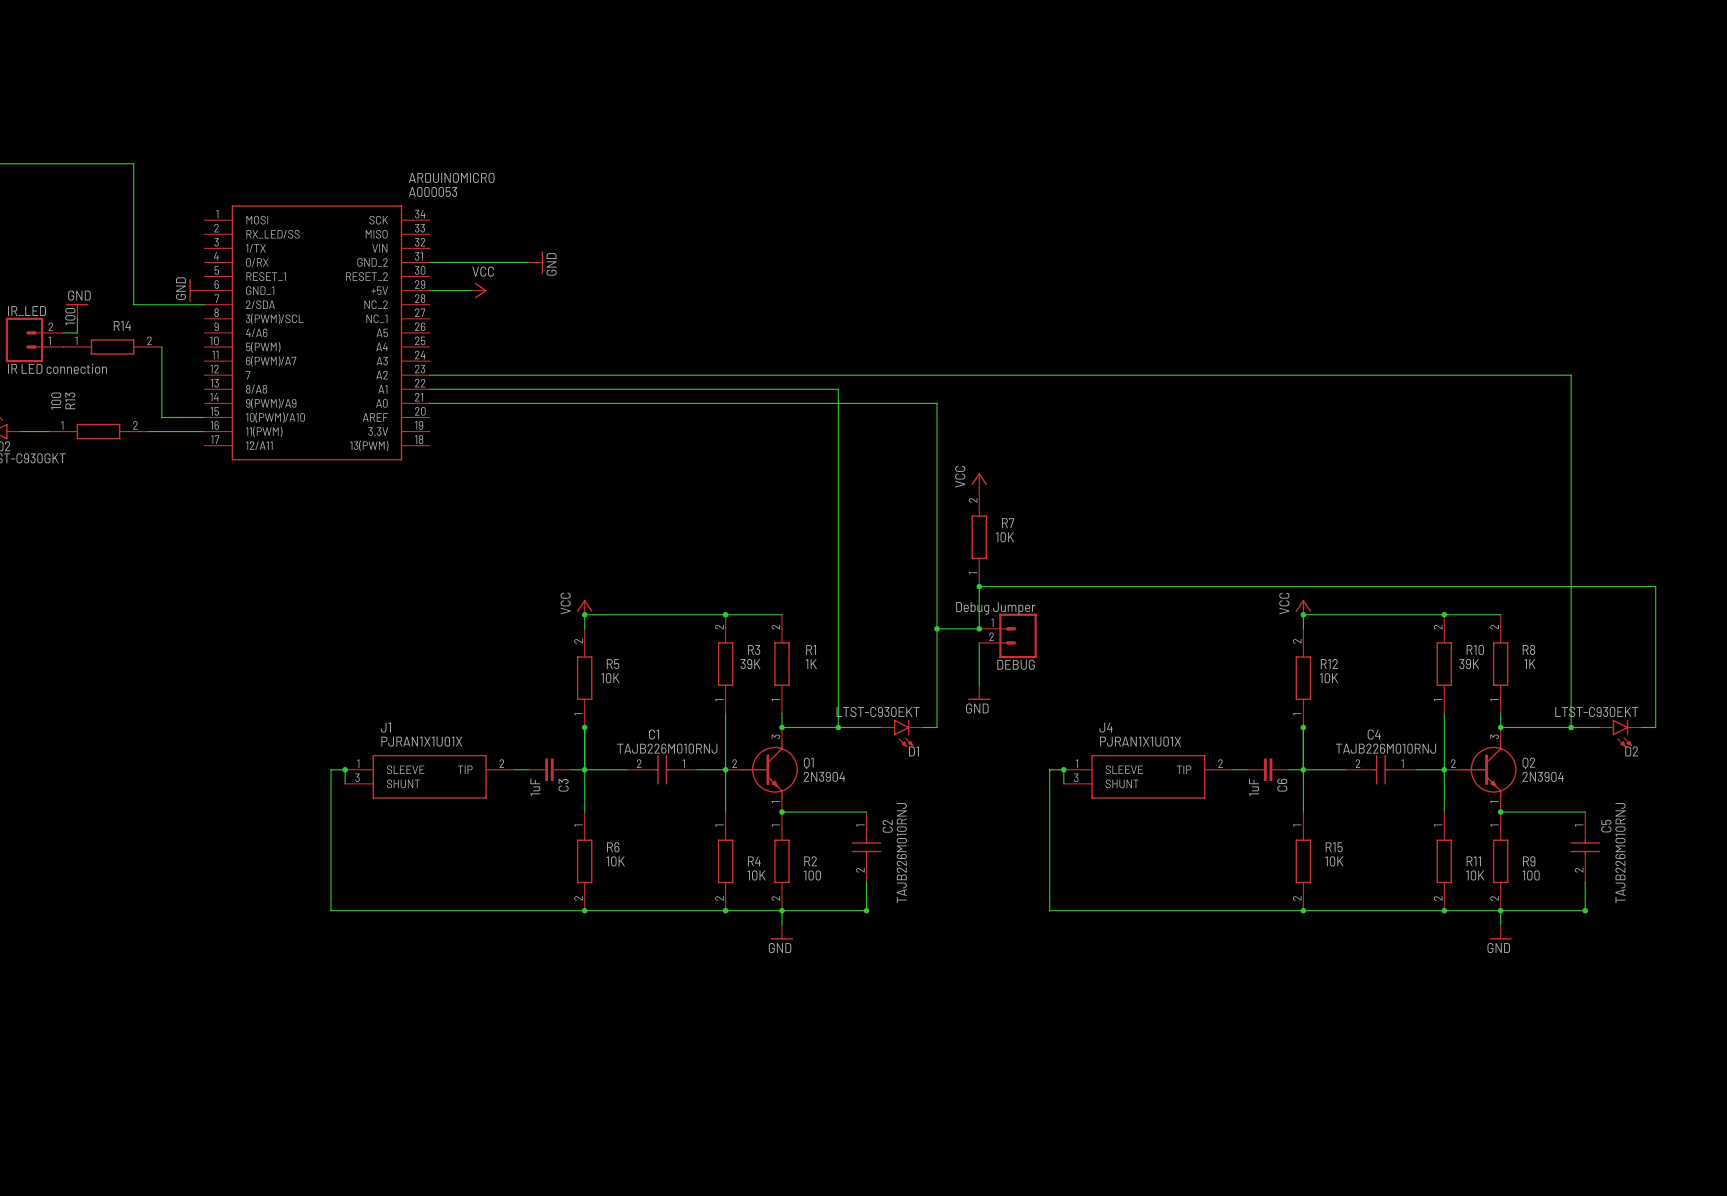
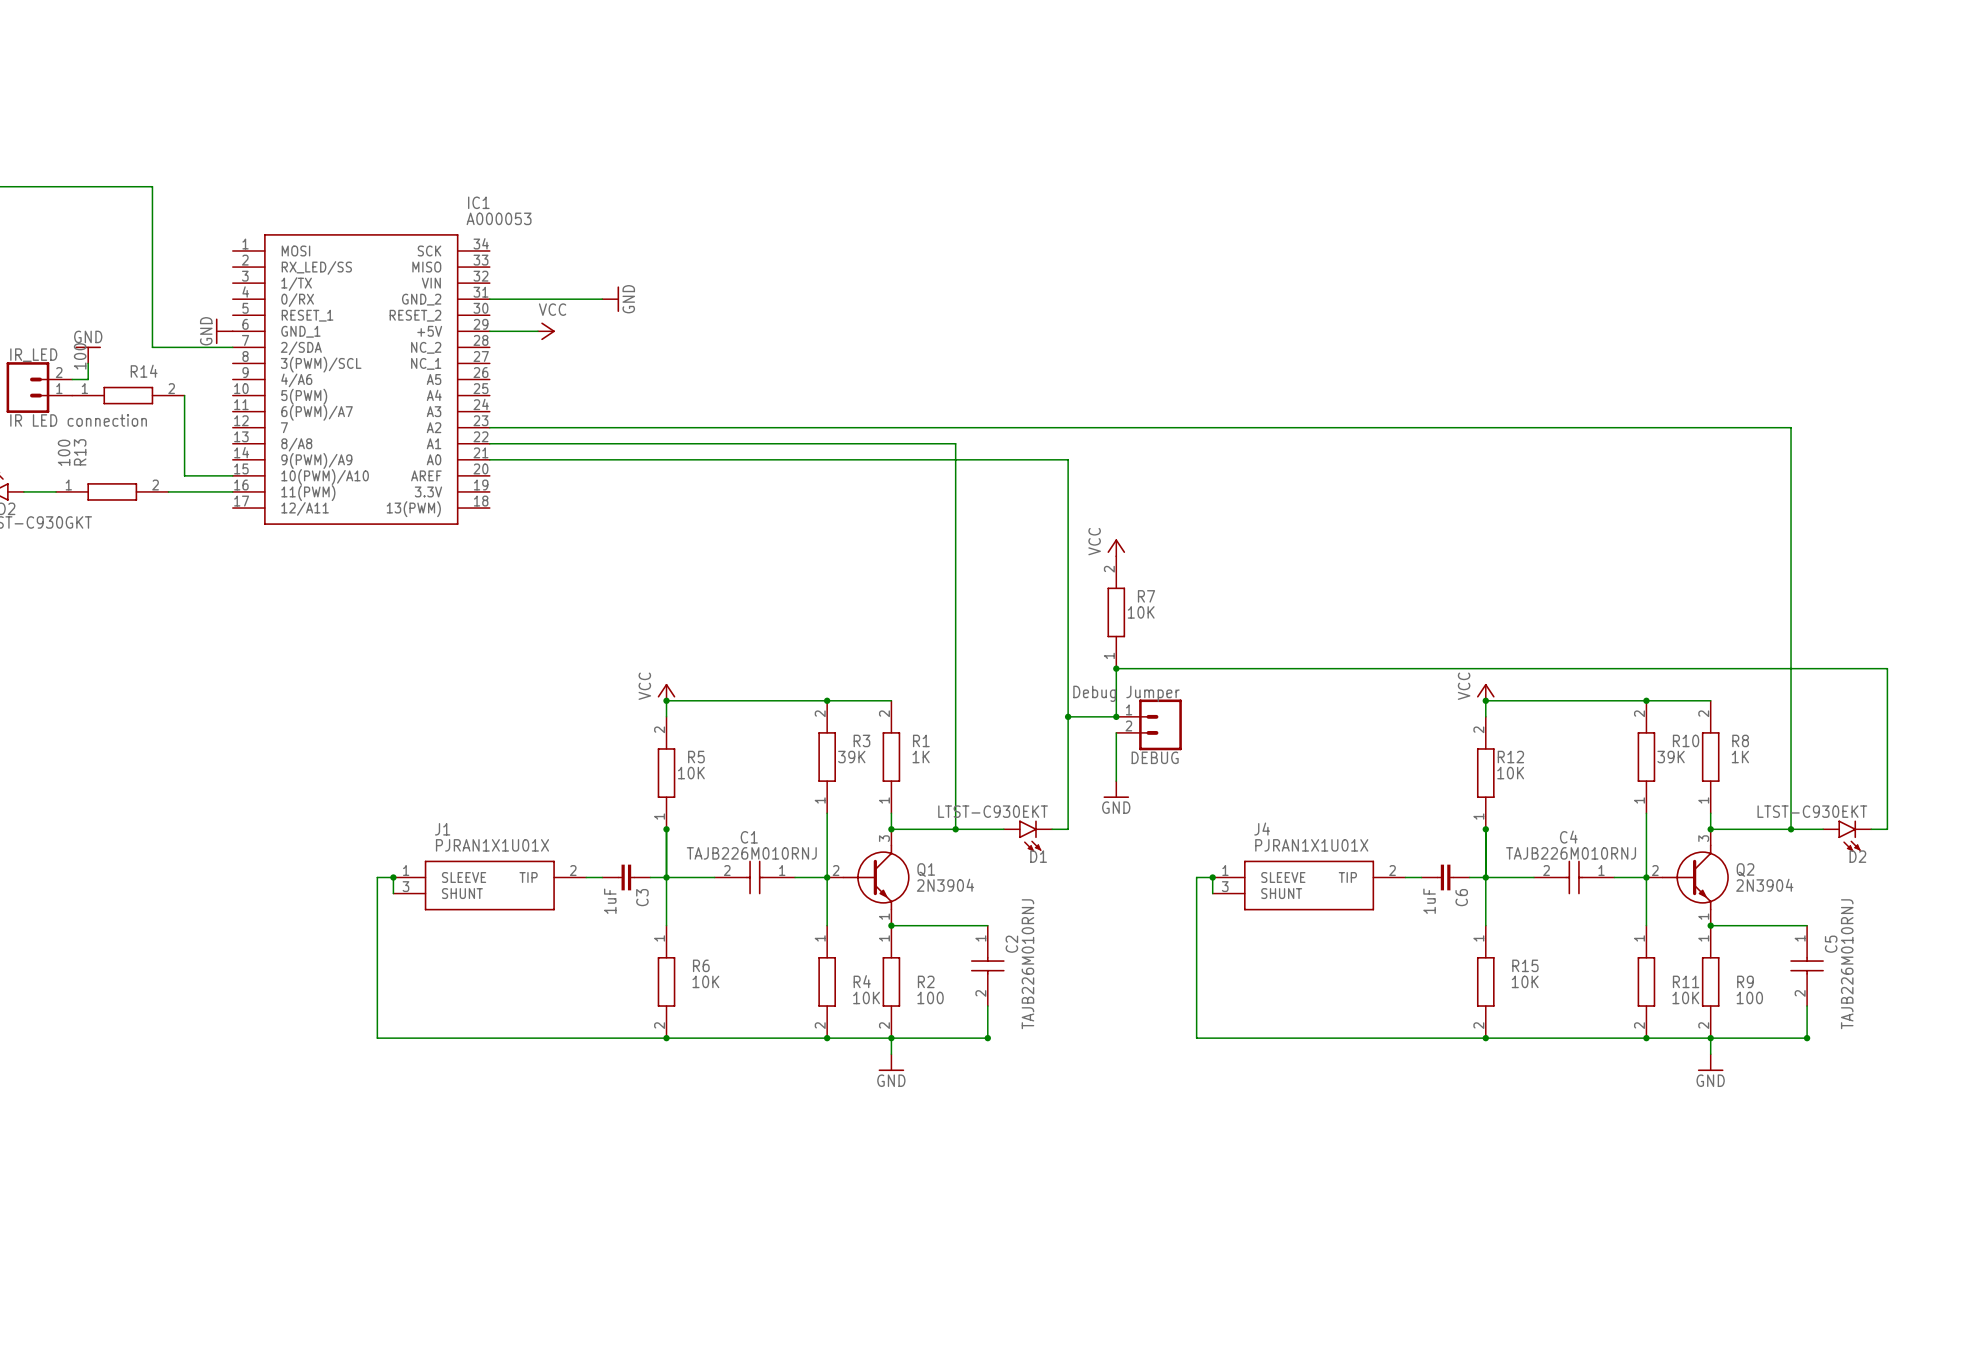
ARDUINOMICRO name: ARDUINOMICRO (451, 177) -> IC1 (478, 202)

